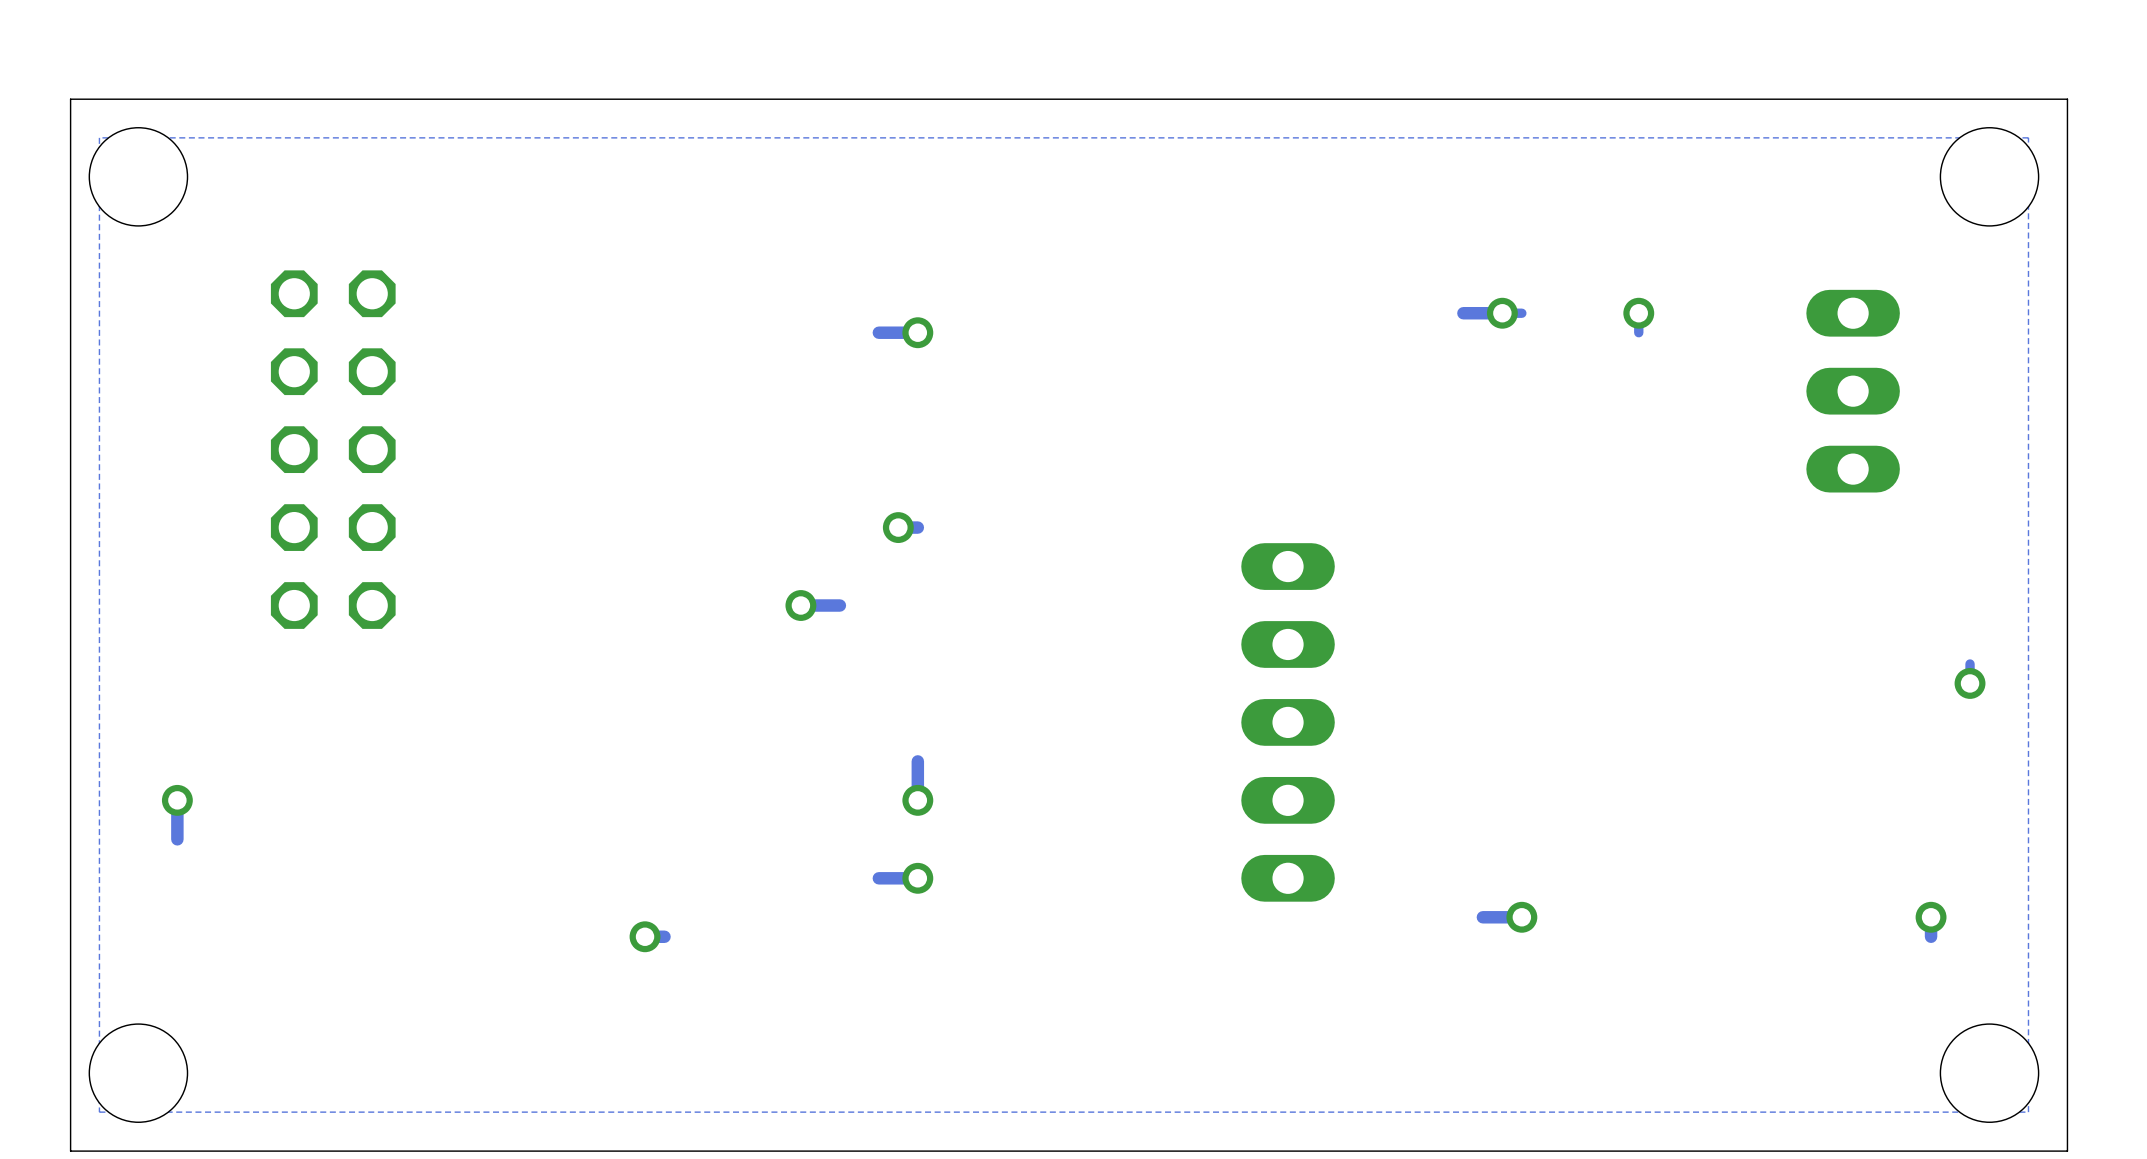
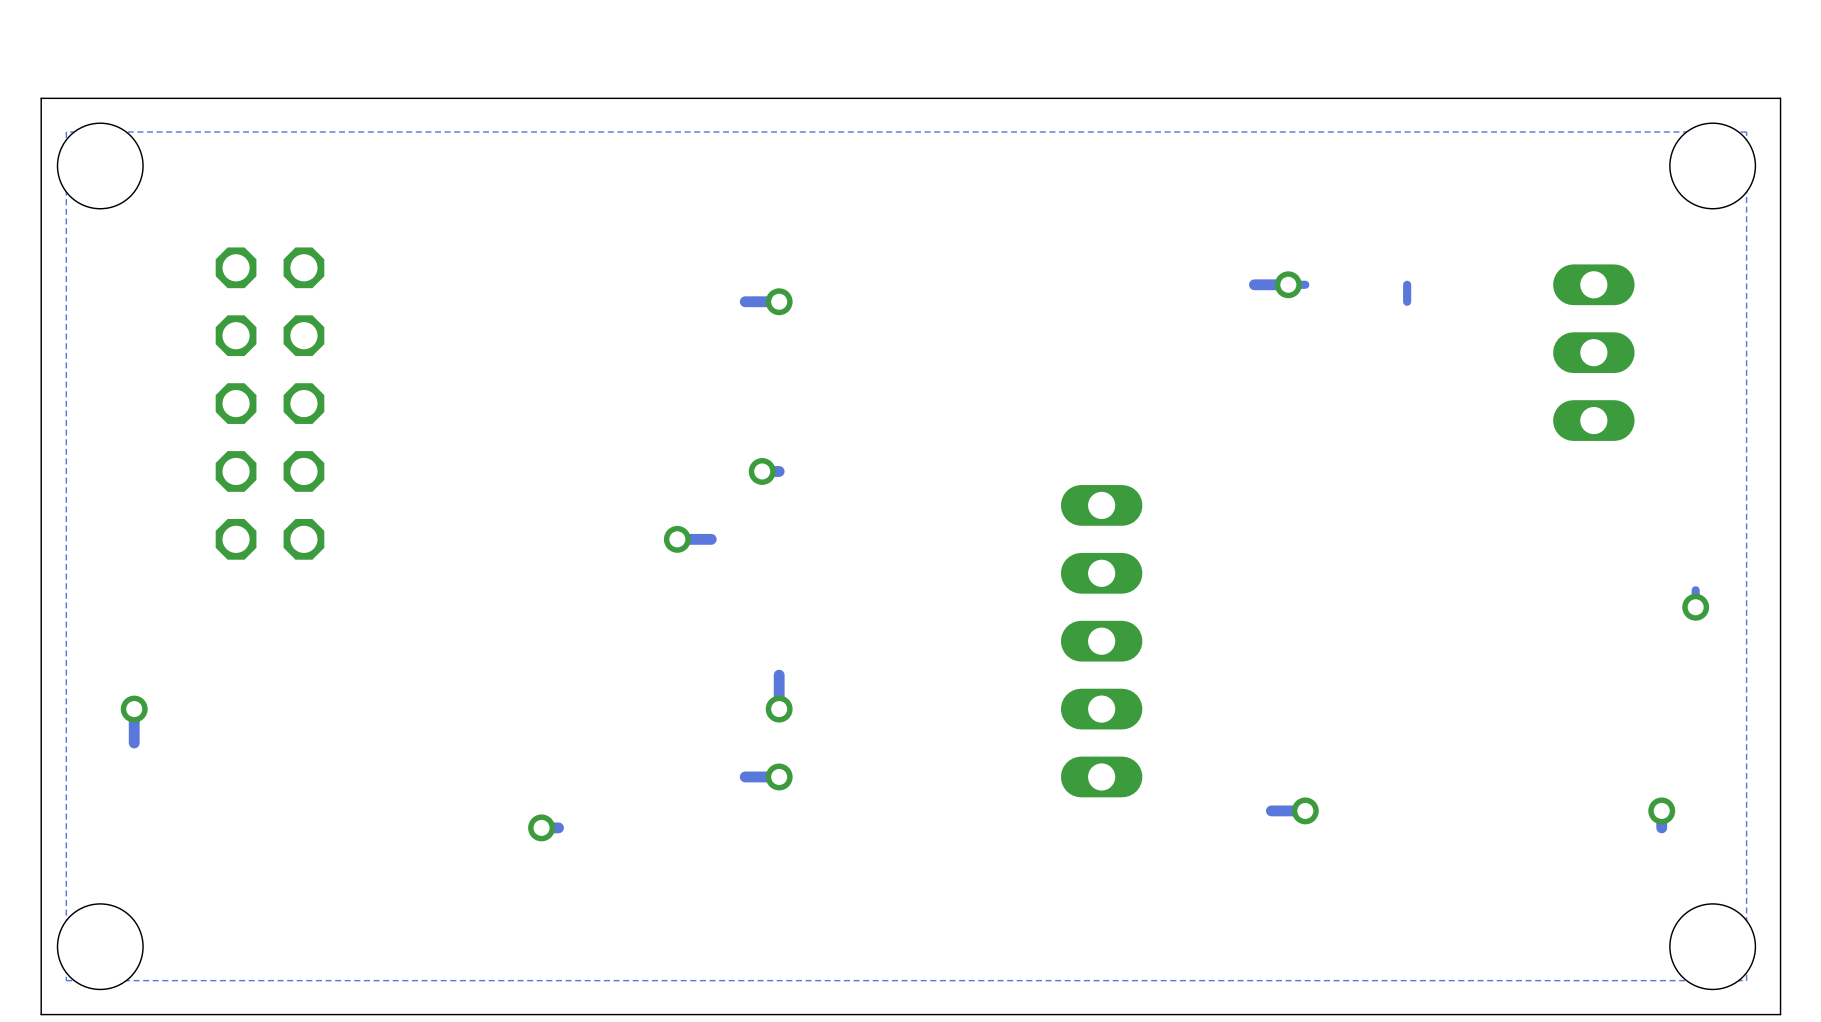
via: (1638, 313) -> none

